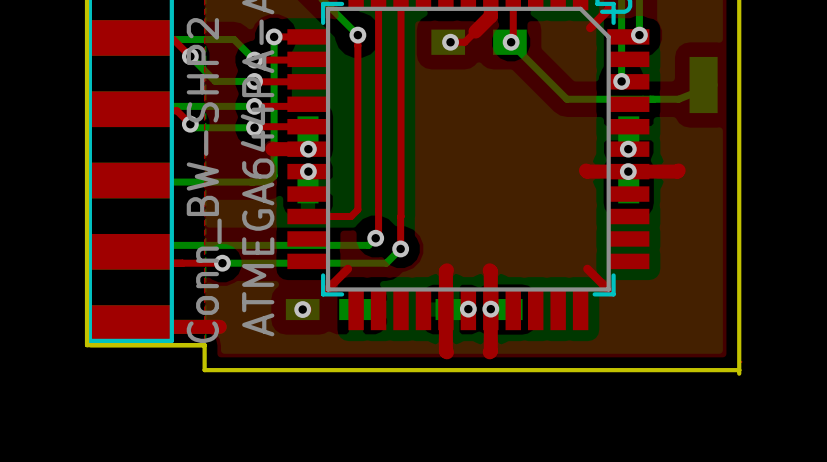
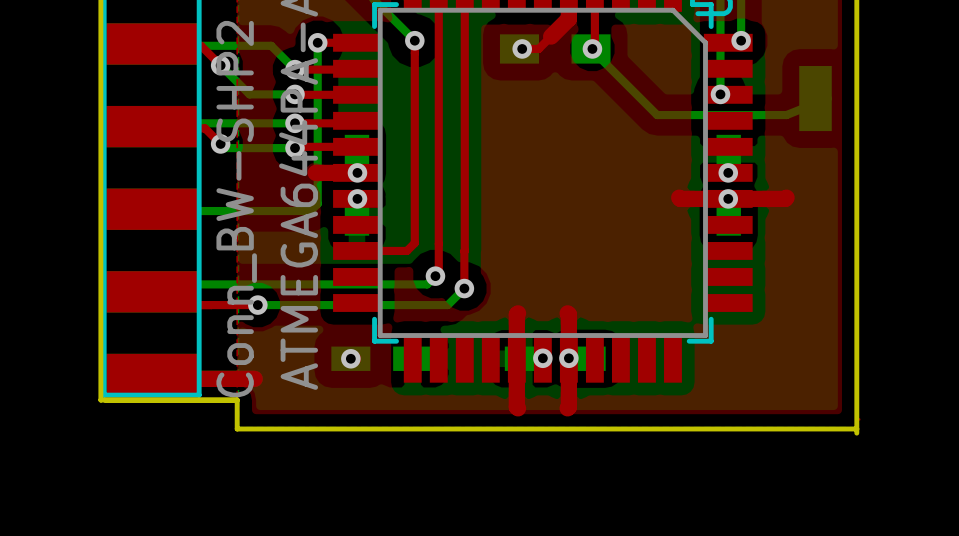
top track: (608, 8) (590, 27) -> none
top track: (347, 268) (326, 290) -> none
top track: (587, 268) (611, 293) -> none

